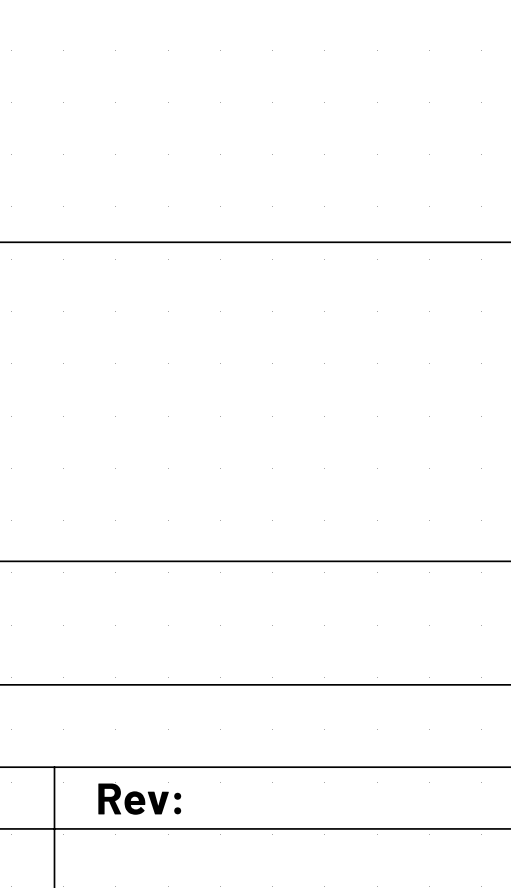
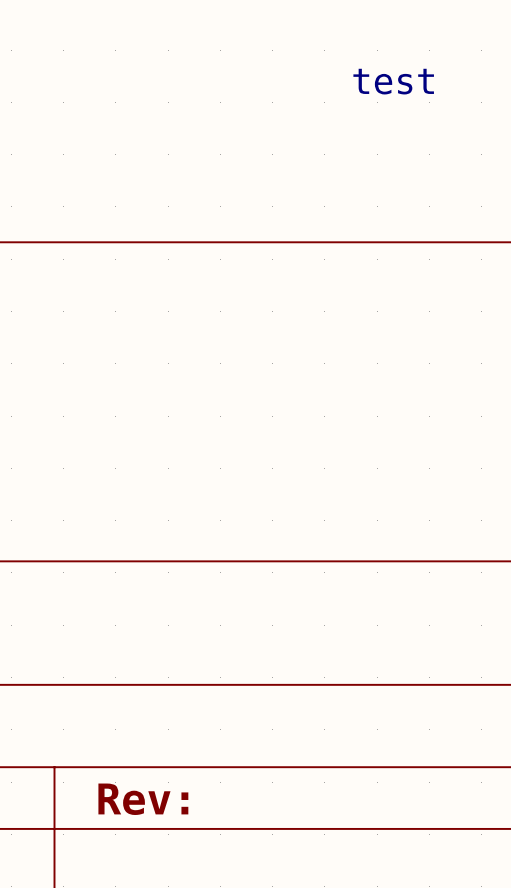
text: none -> test (393, 81)

